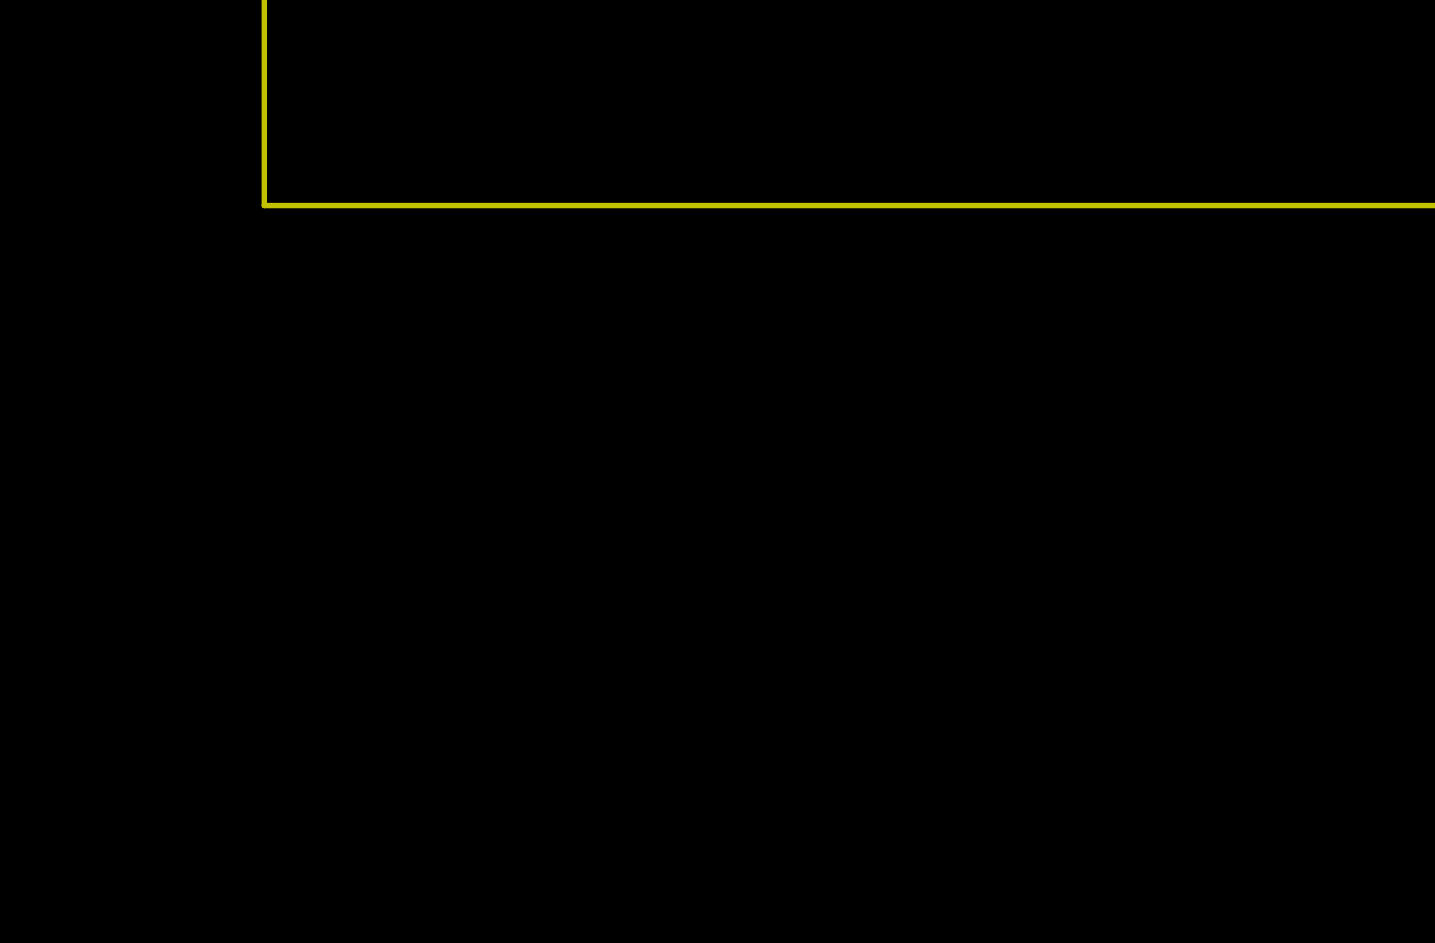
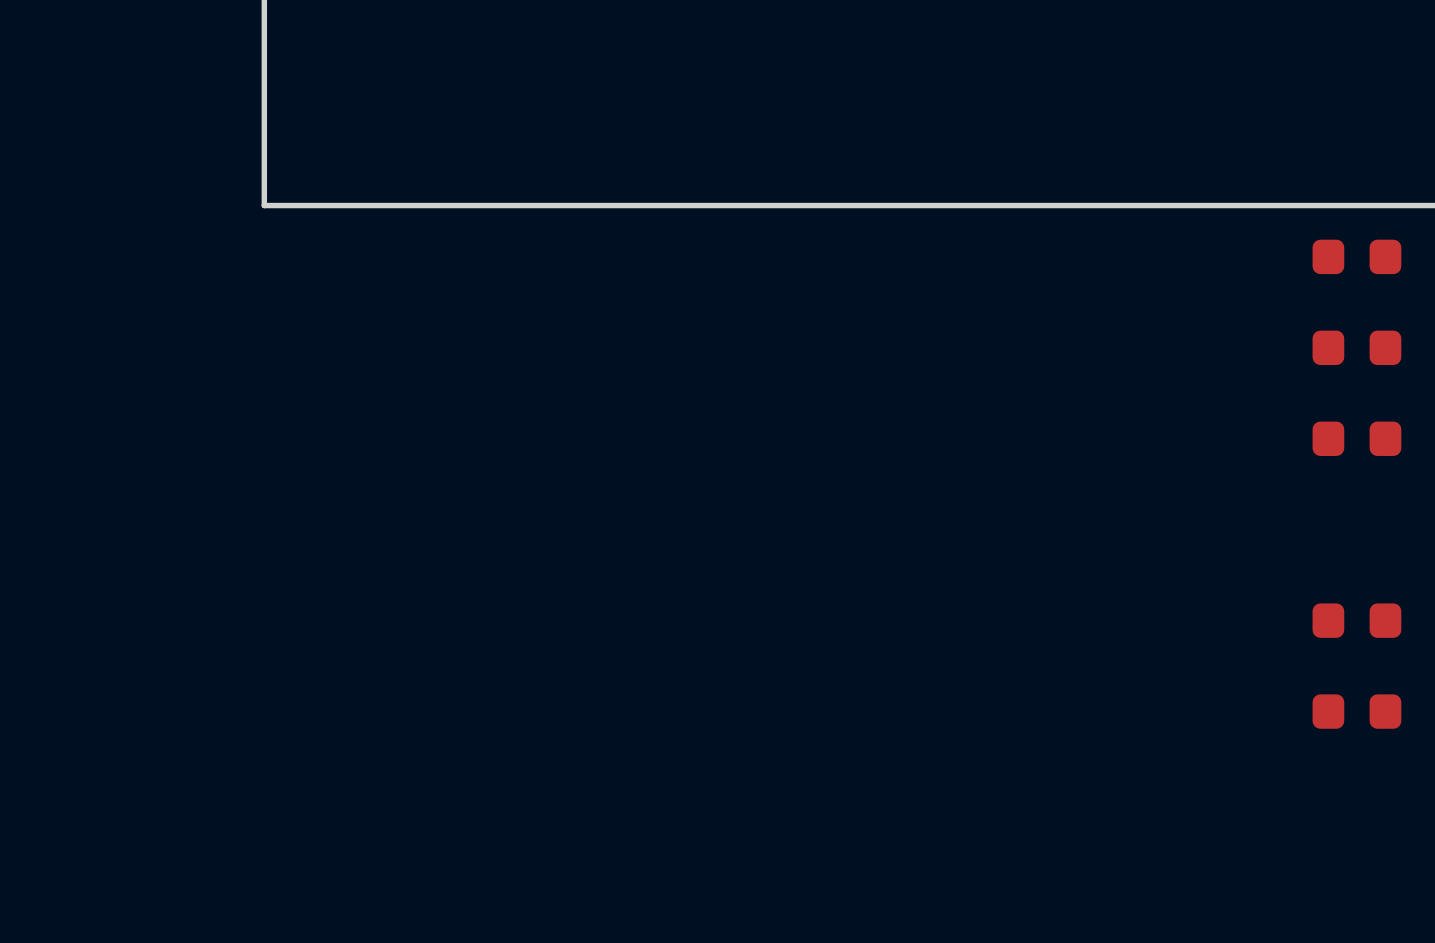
part: none -> (1356, 256)
part: none -> (1356, 347)
part: none -> (1356, 438)
part: none -> (1356, 620)
part: none -> (1356, 711)

